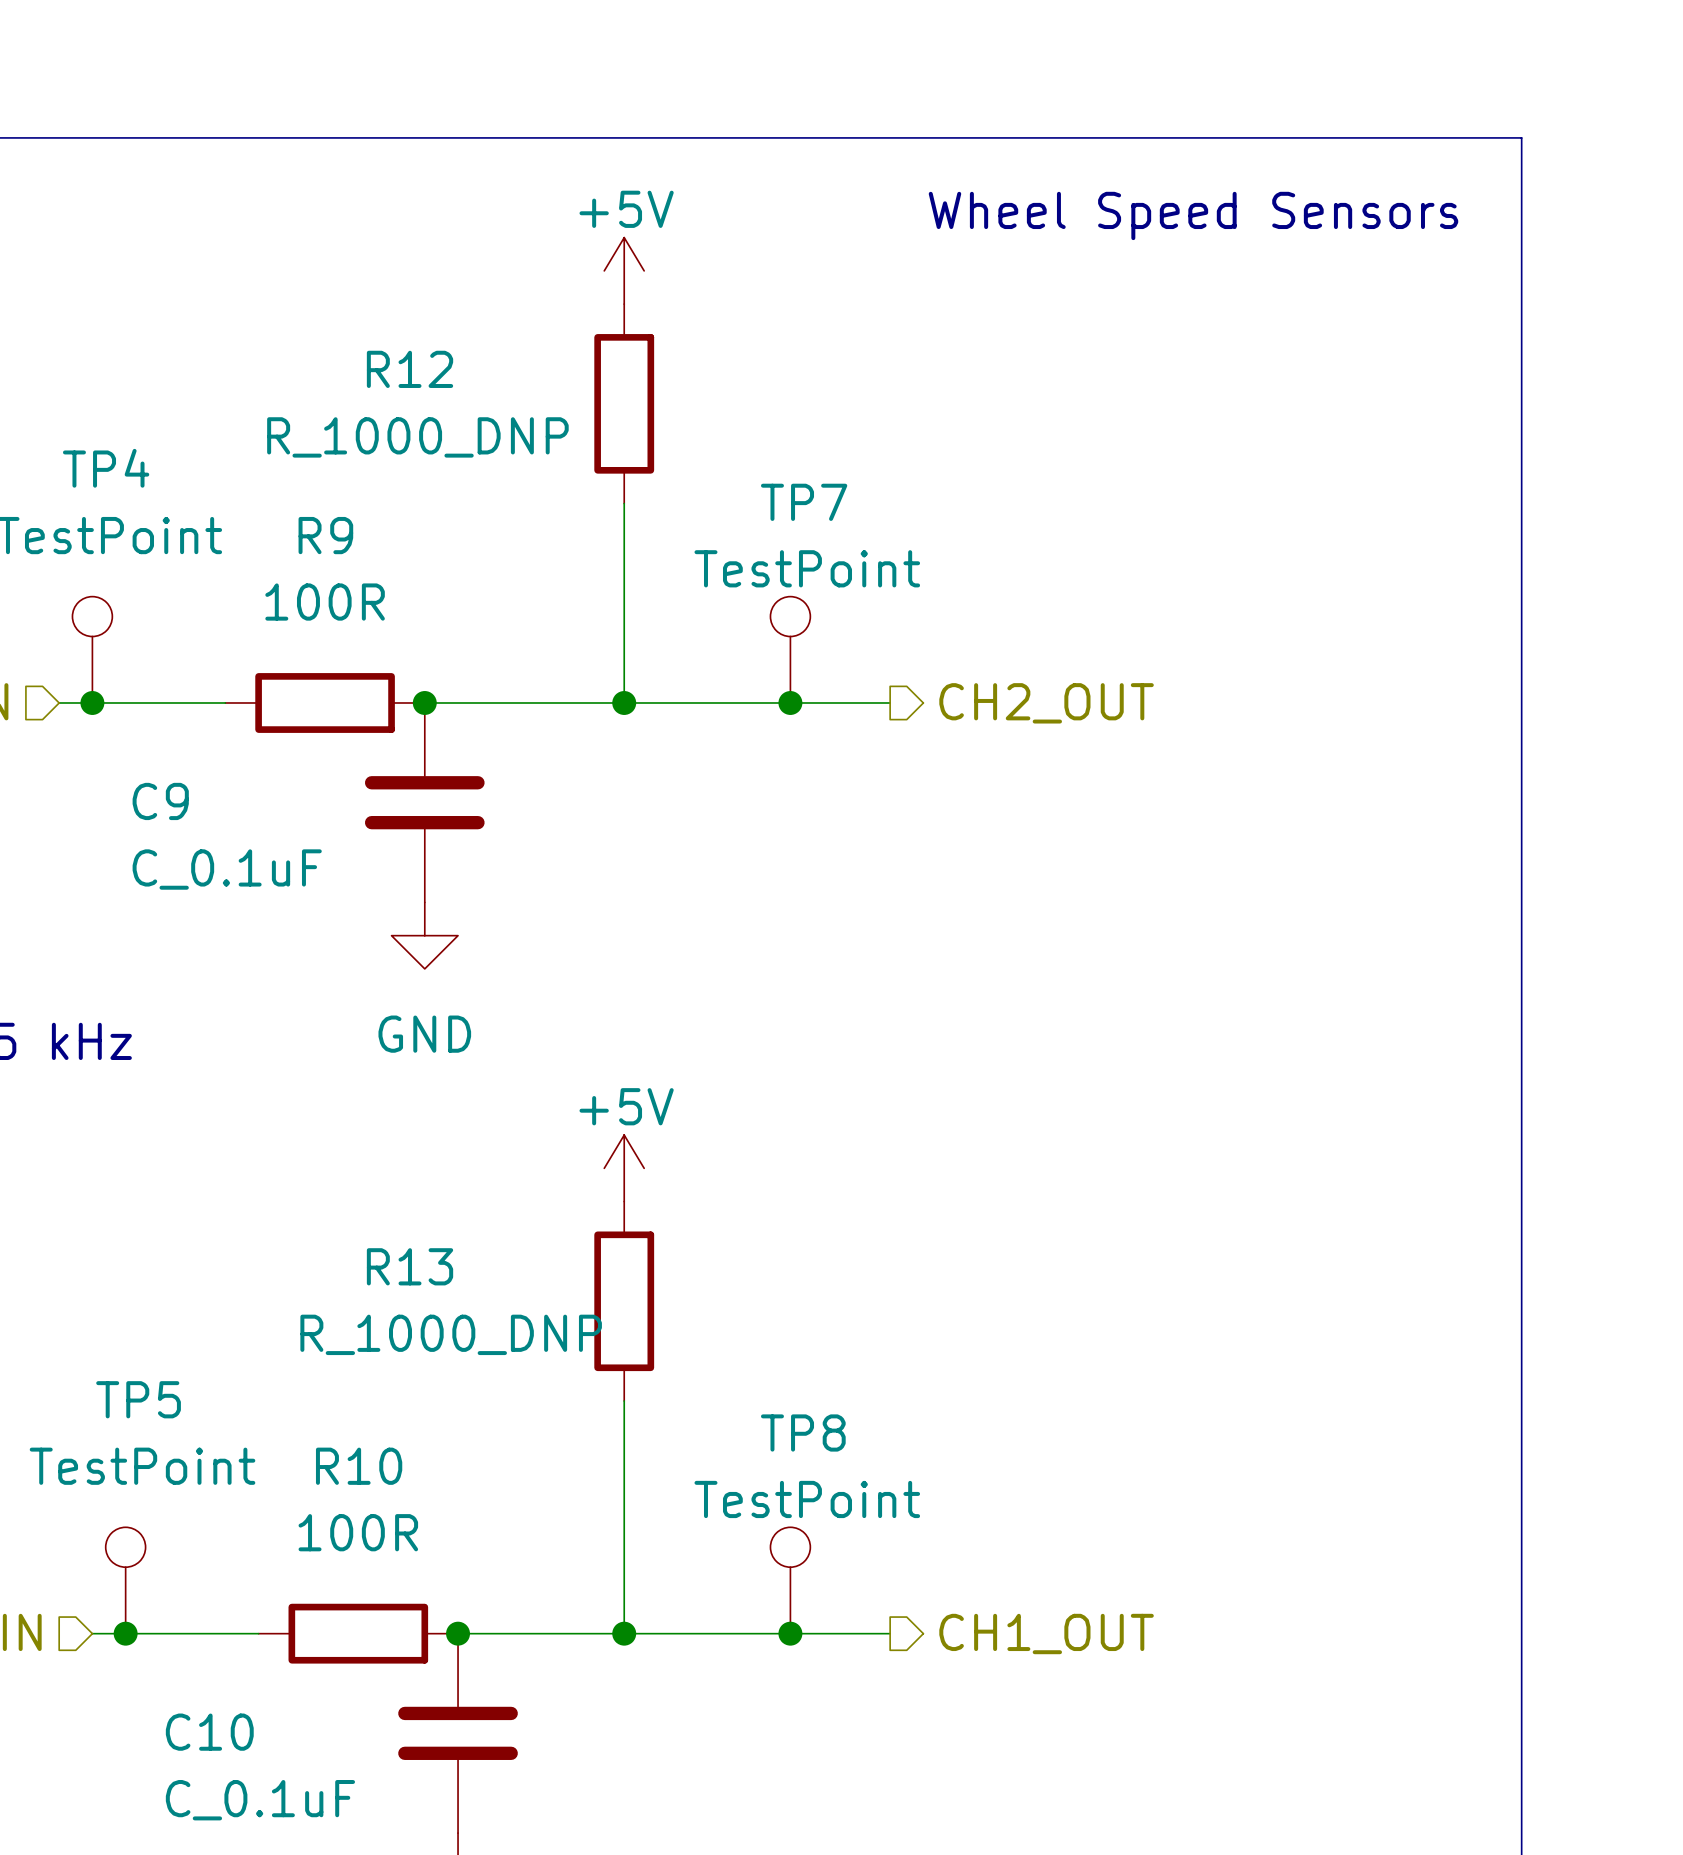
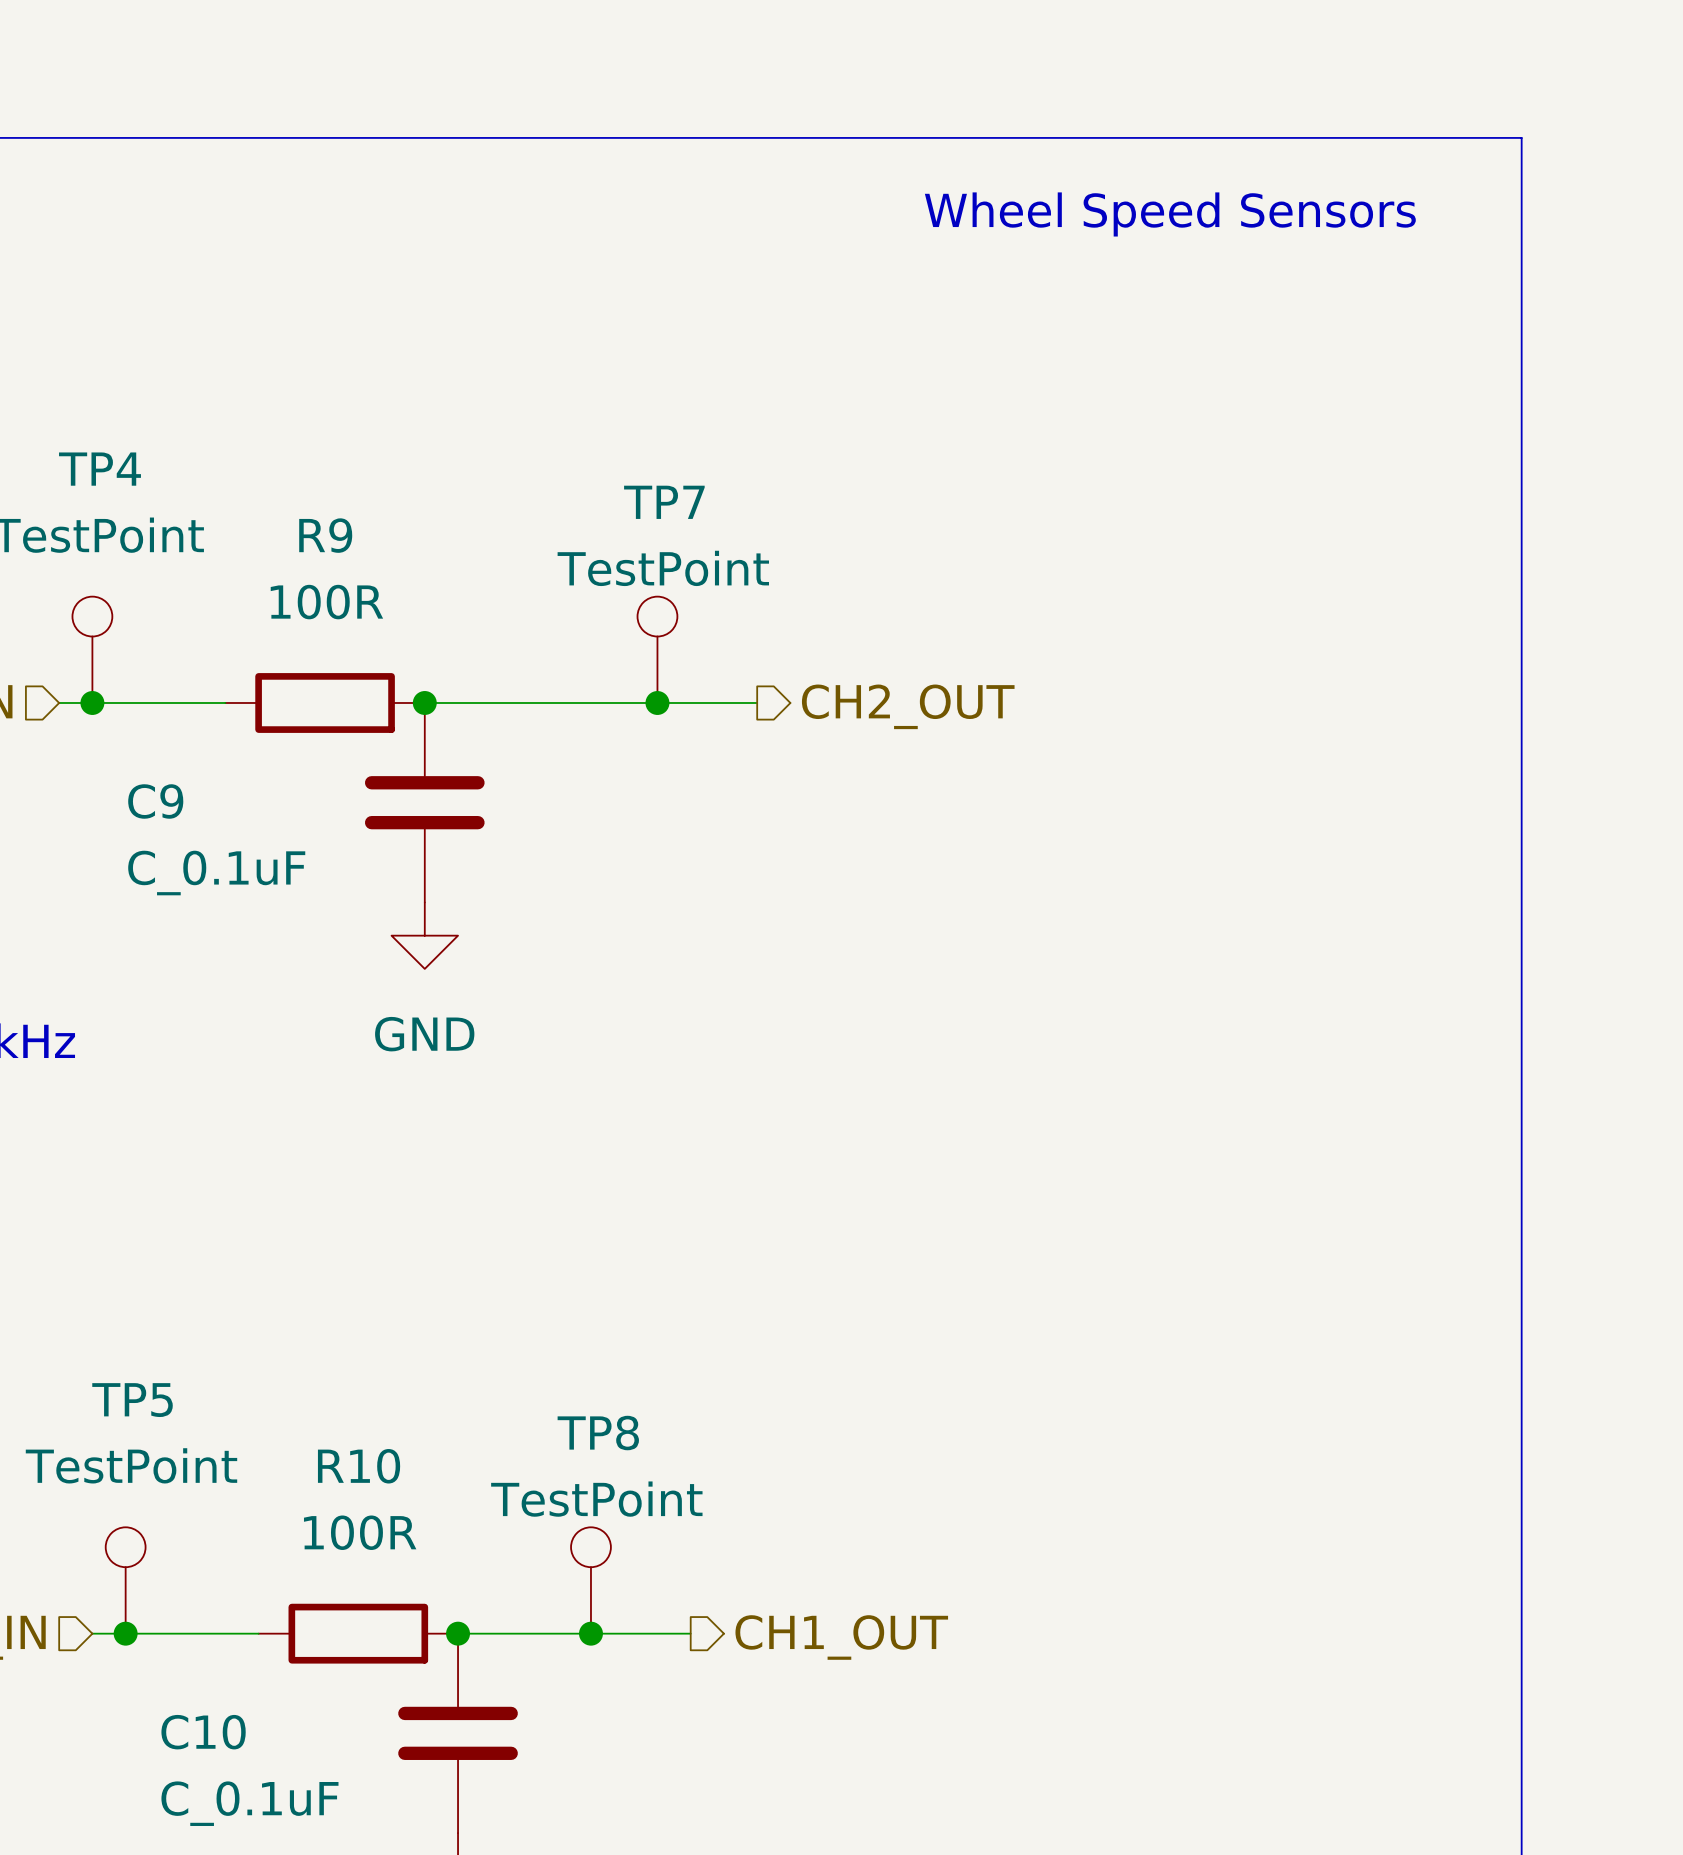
power symbol: +5V (624, 270) -> none
R12: R_1000_DNP (624, 403) -> none
wire: (624, 503) (624, 702) -> none
TP7 position: (790, 649) -> (657, 649)
junction position: (624, 702) -> (657, 702)
wire: (757, 702) (890, 702) -> none
junction: (790, 702) -> none
hierarchical label position: CH2_OUT (1046, 703) -> CH2_OUT (908, 706)
power symbol: +5V (624, 1168) -> none
R13: R_1000_DNP (624, 1301) -> none
wire: (624, 1401) (624, 1633) -> none
TP8 position: (790, 1580) -> (590, 1580)
junction position: (624, 1633) -> (590, 1633)
wire: (690, 1633) (890, 1633) -> none
junction: (790, 1633) -> none
hierarchical label position: CH1_OUT (1046, 1634) -> CH1_OUT (841, 1637)

